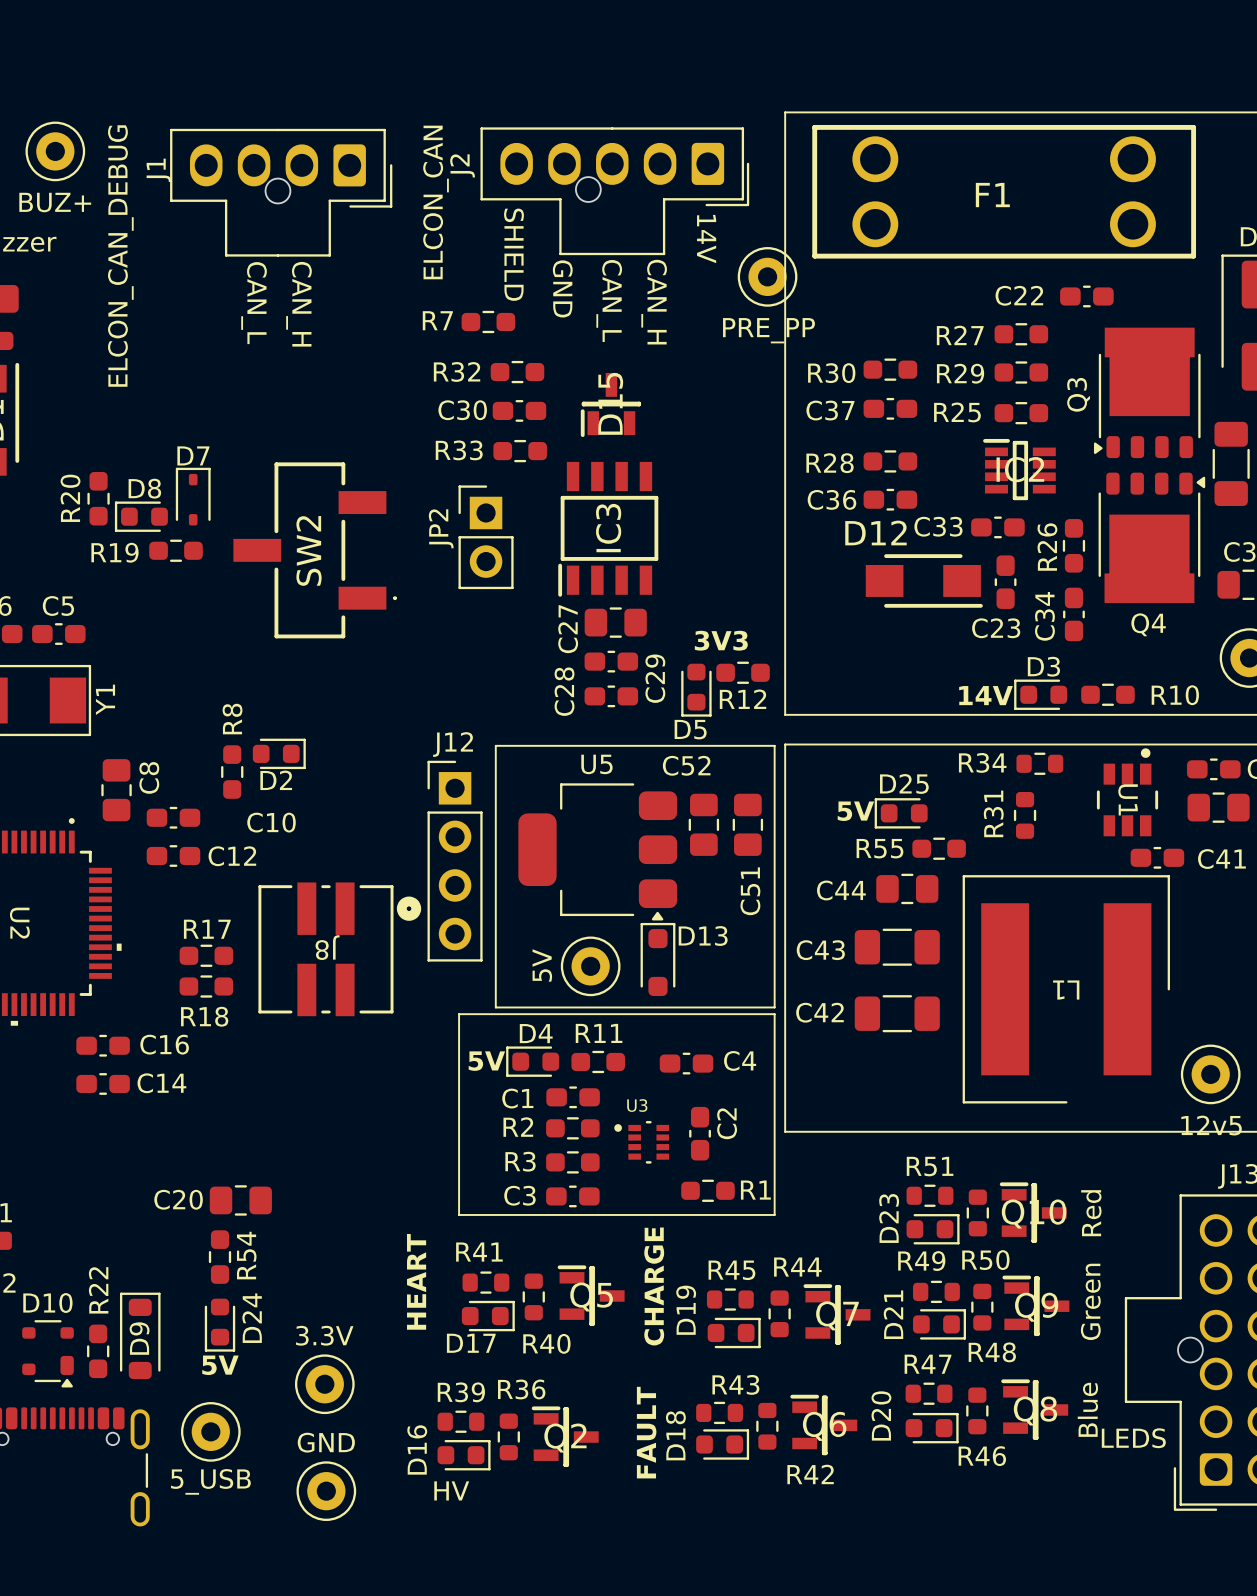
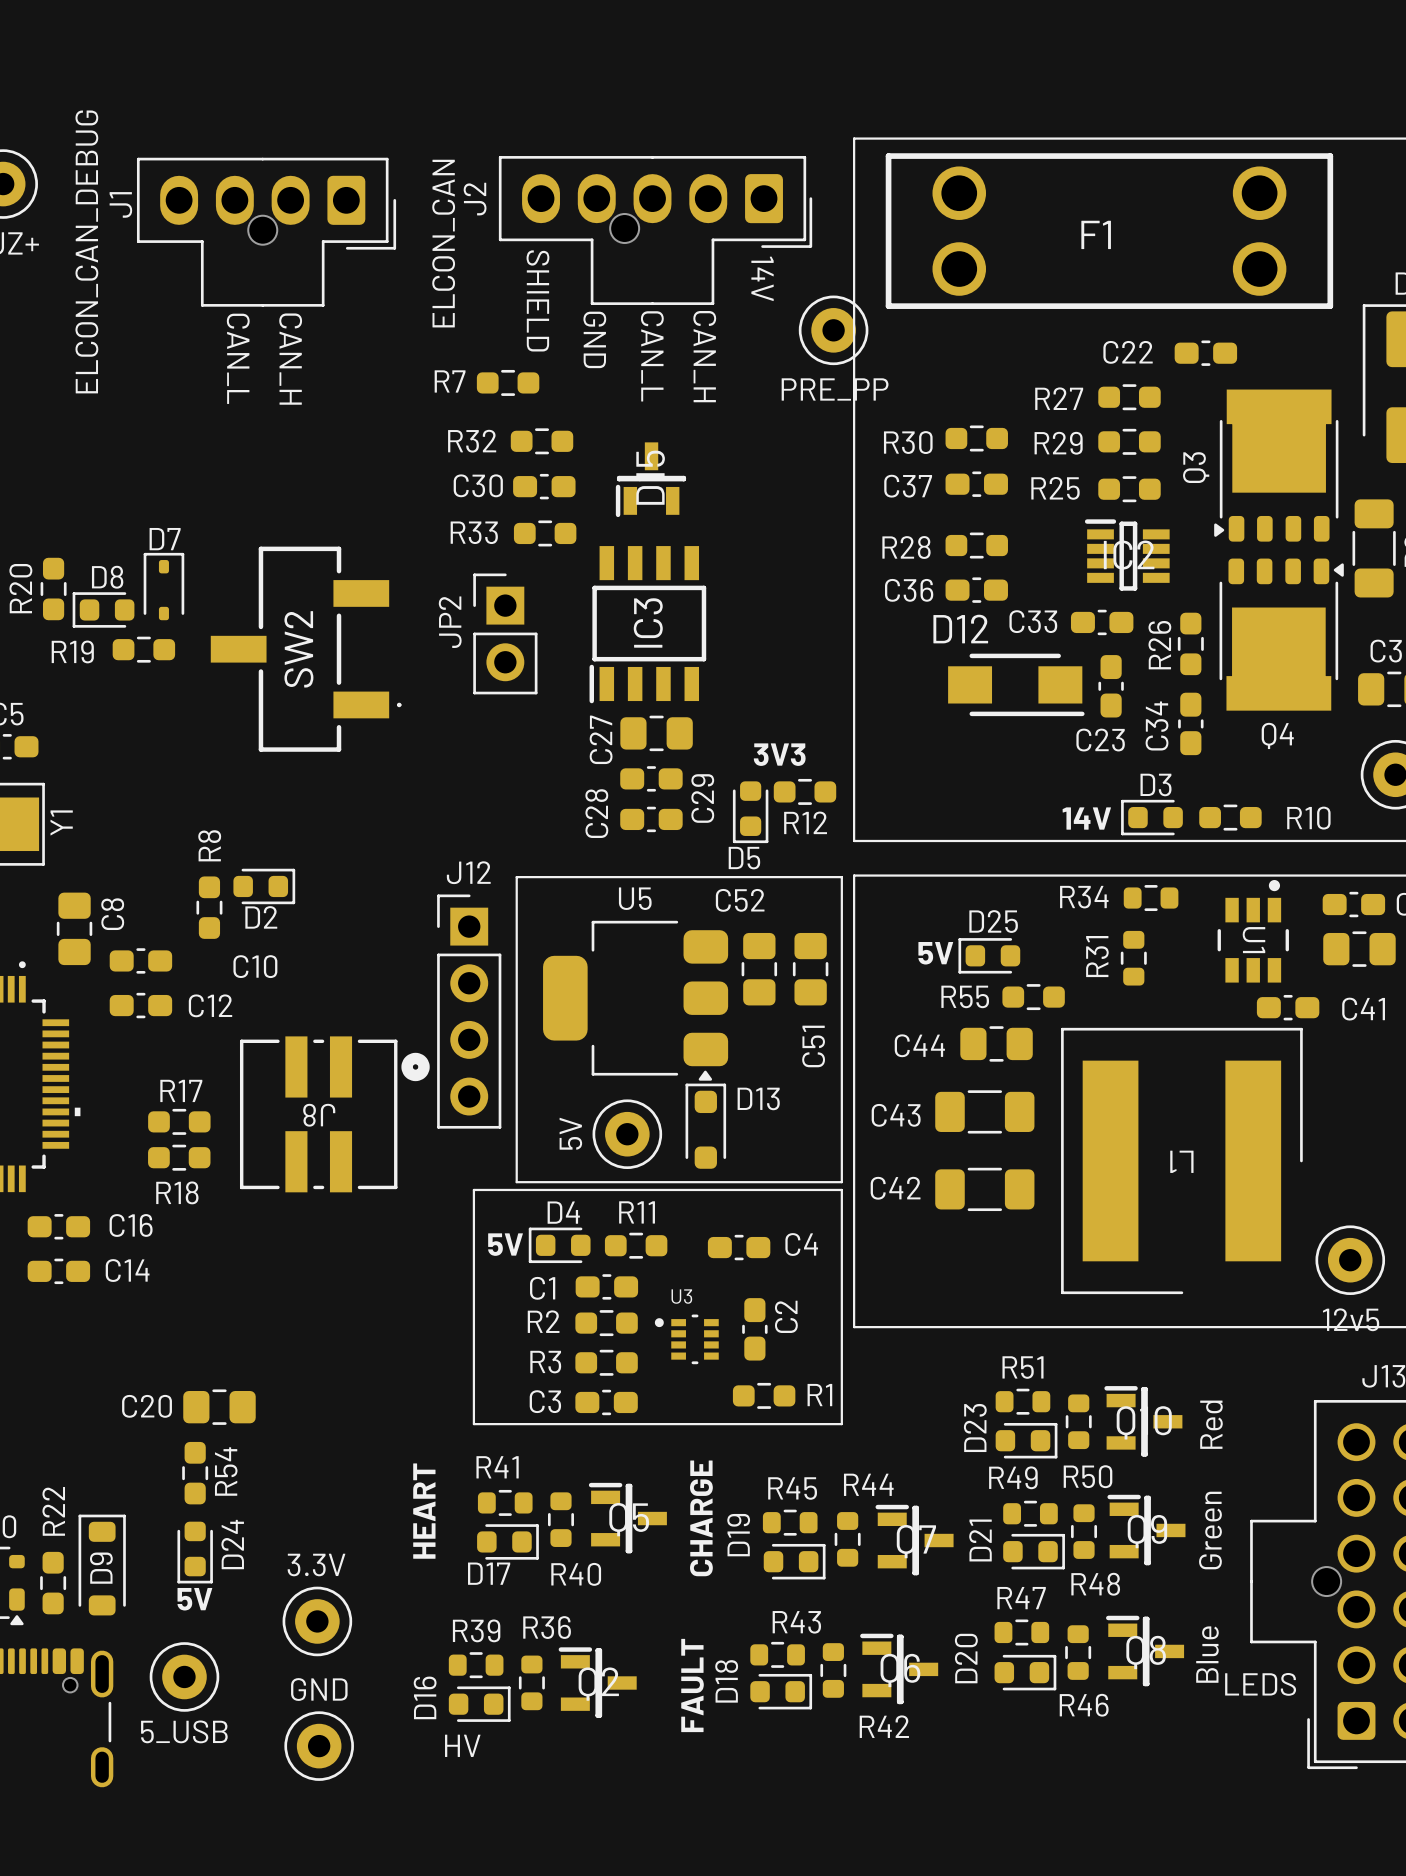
J1 value position: ELCON_CAN_DEBUG (120, 256) -> ELCON_CAN_DEBUG (86, 251)

